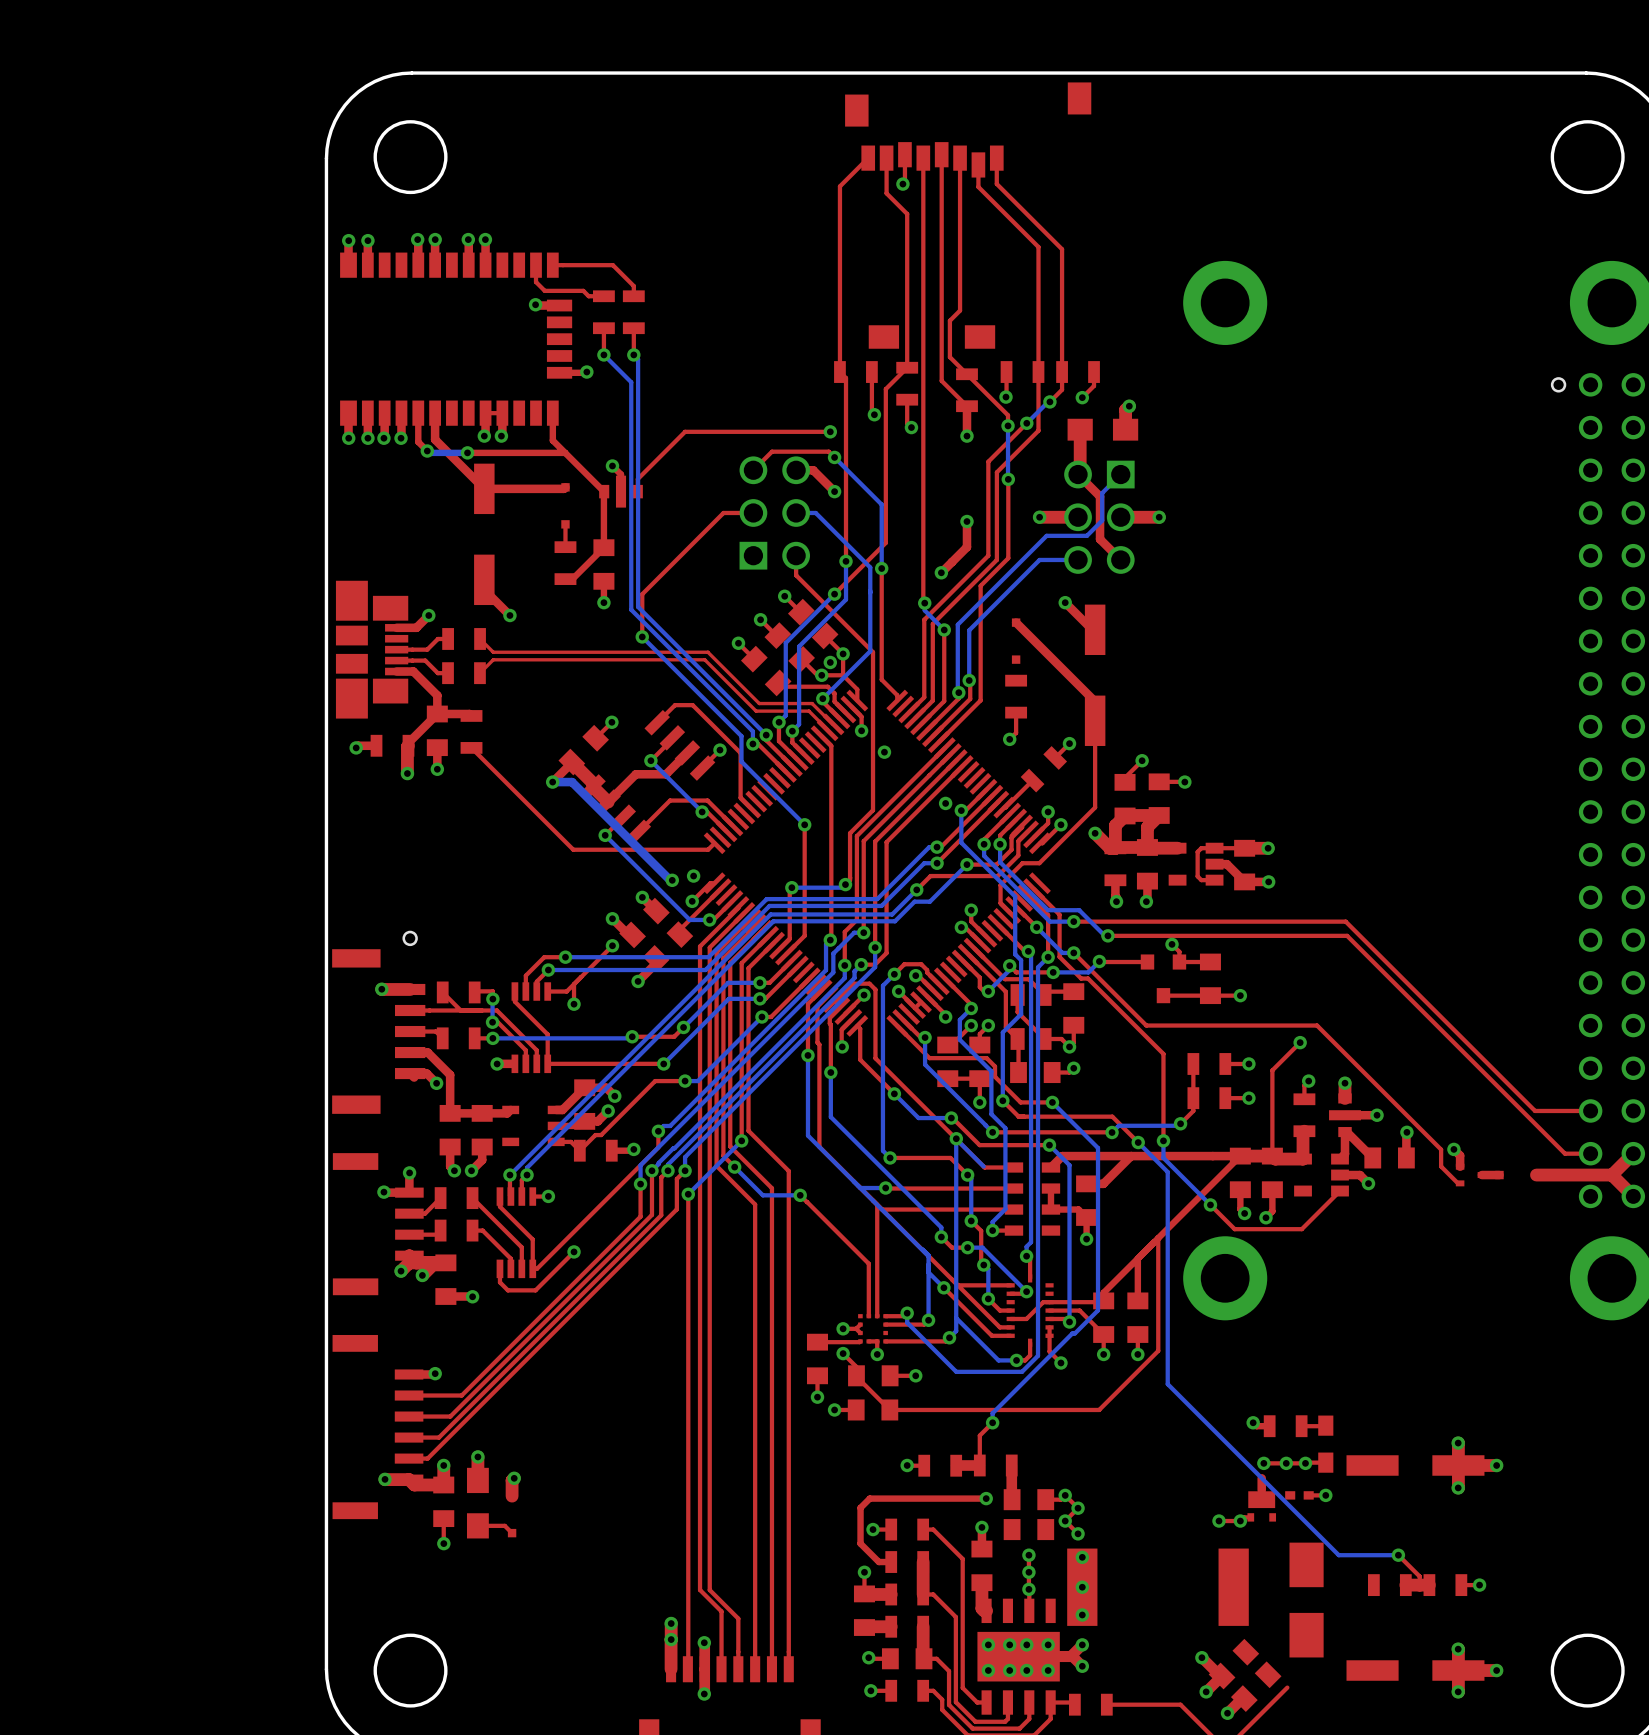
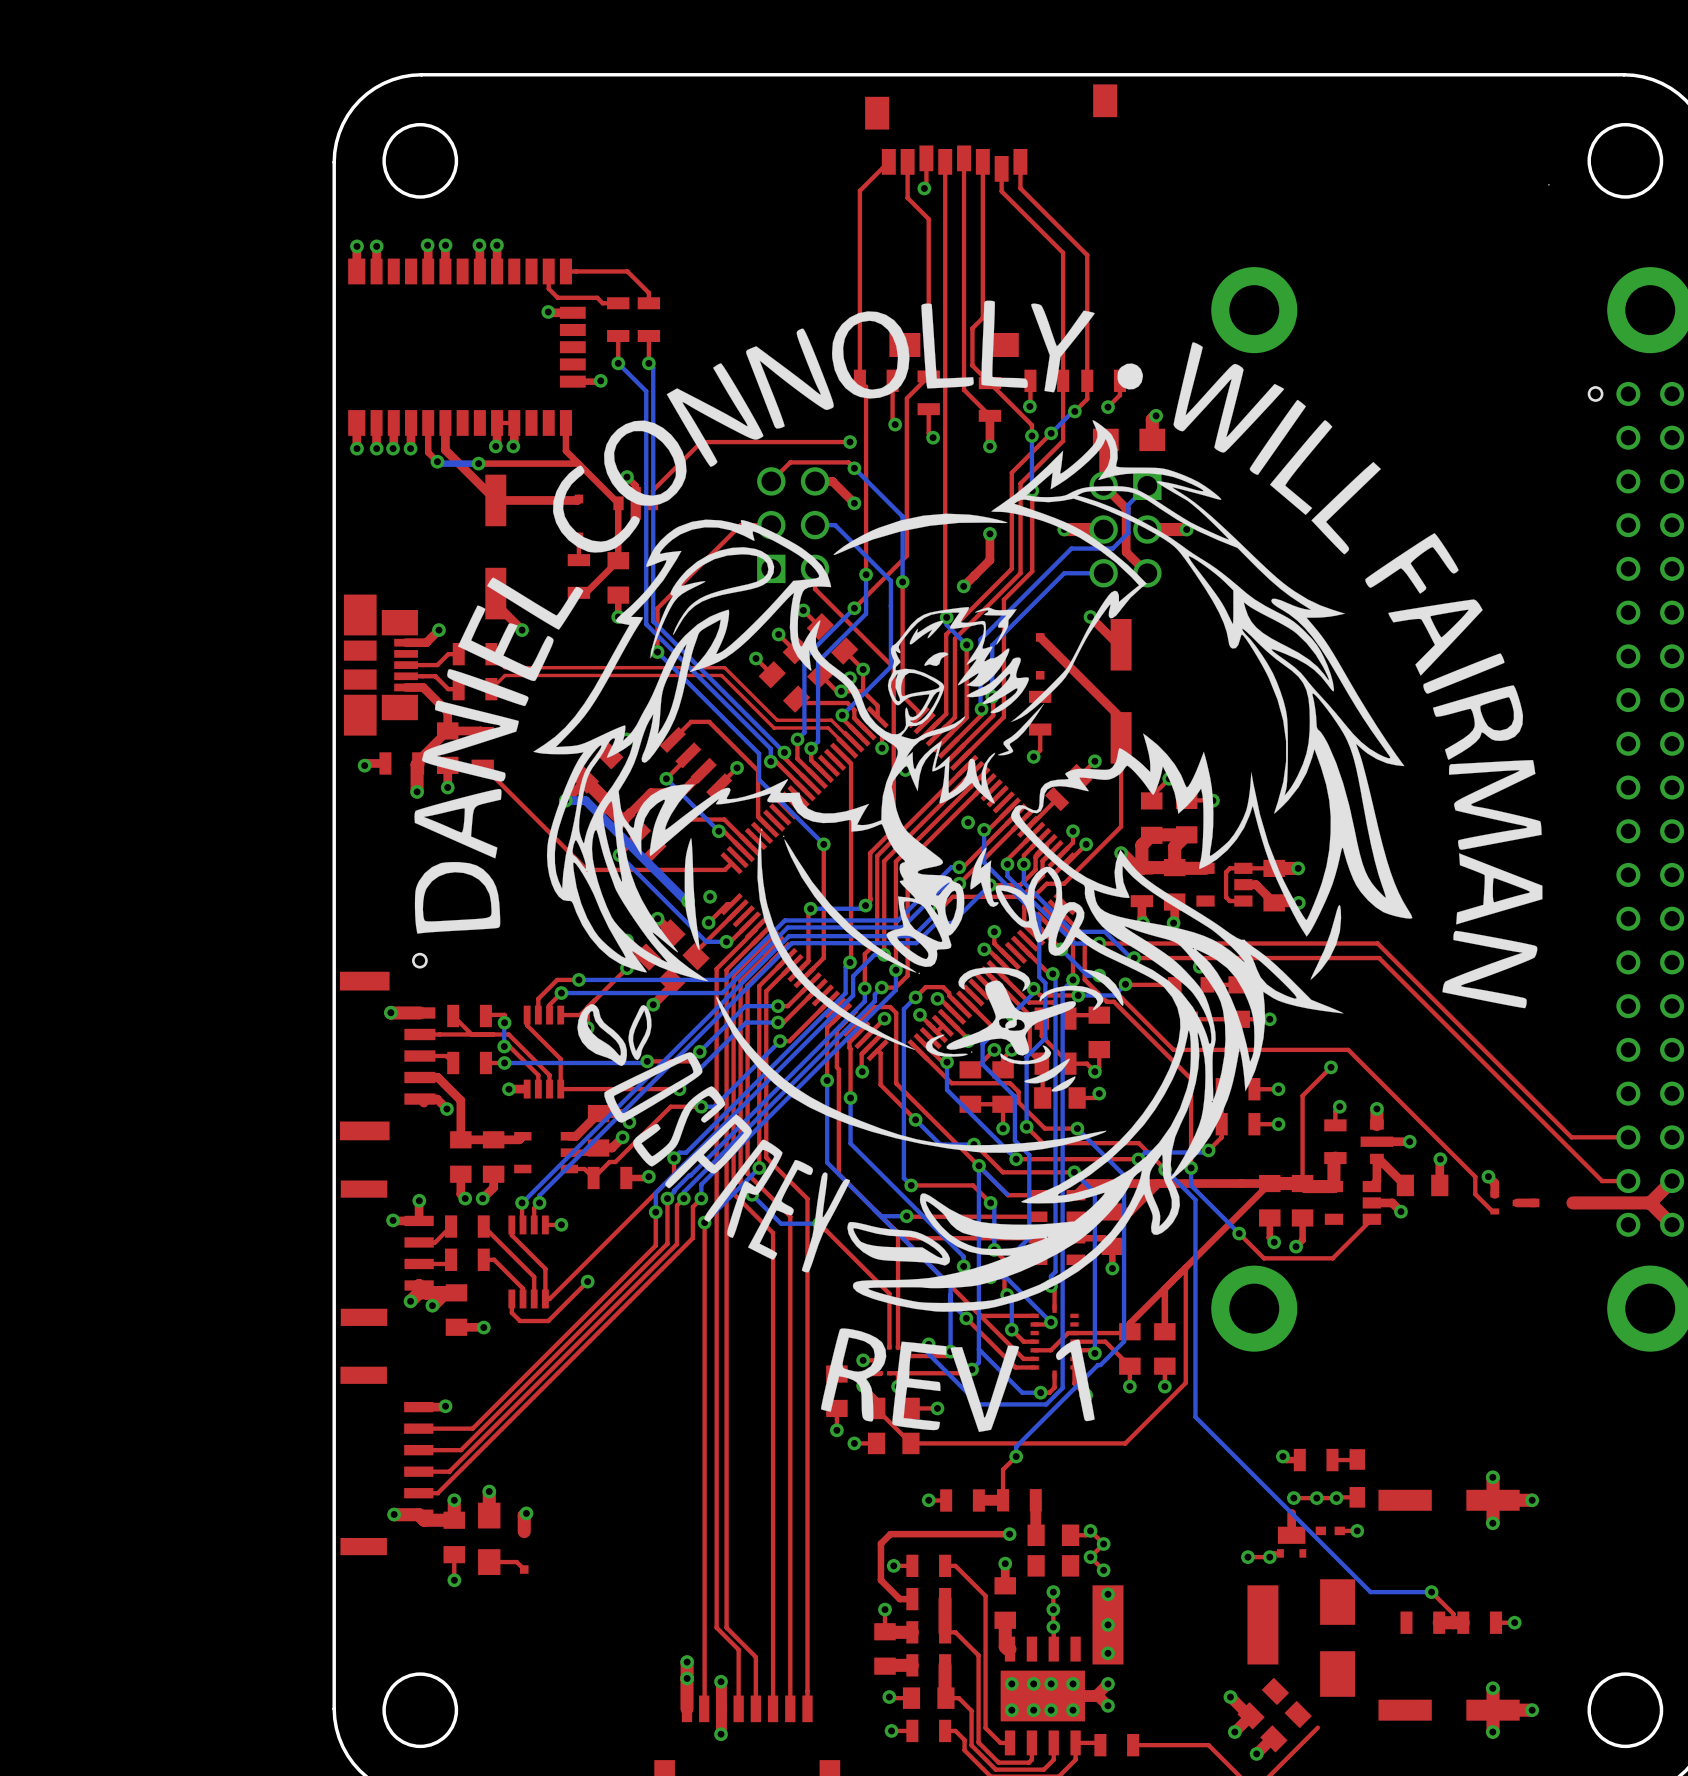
drawing: none -> [414, 183, 1550, 1432]

